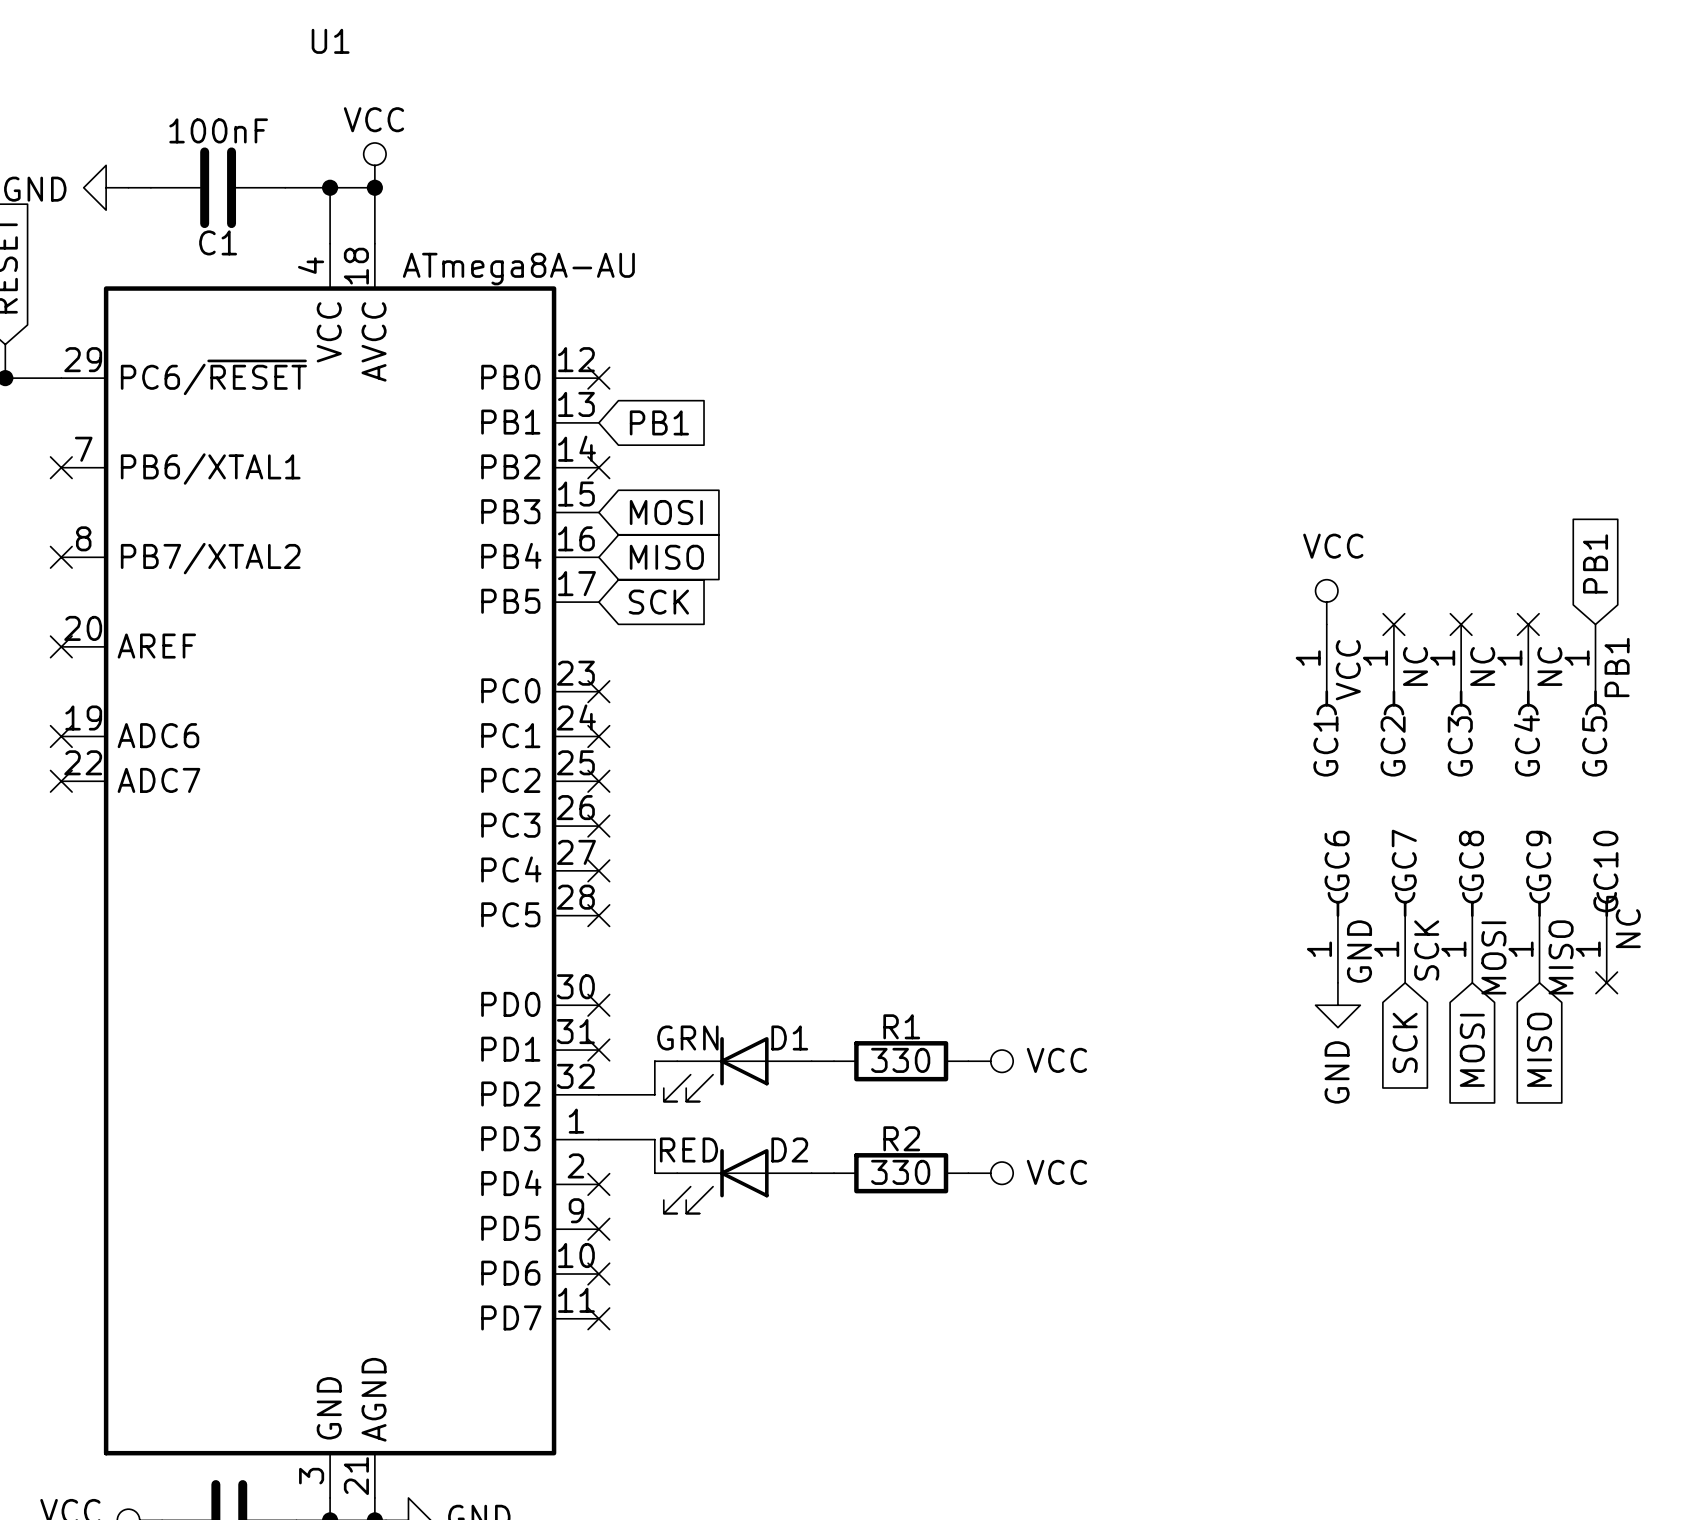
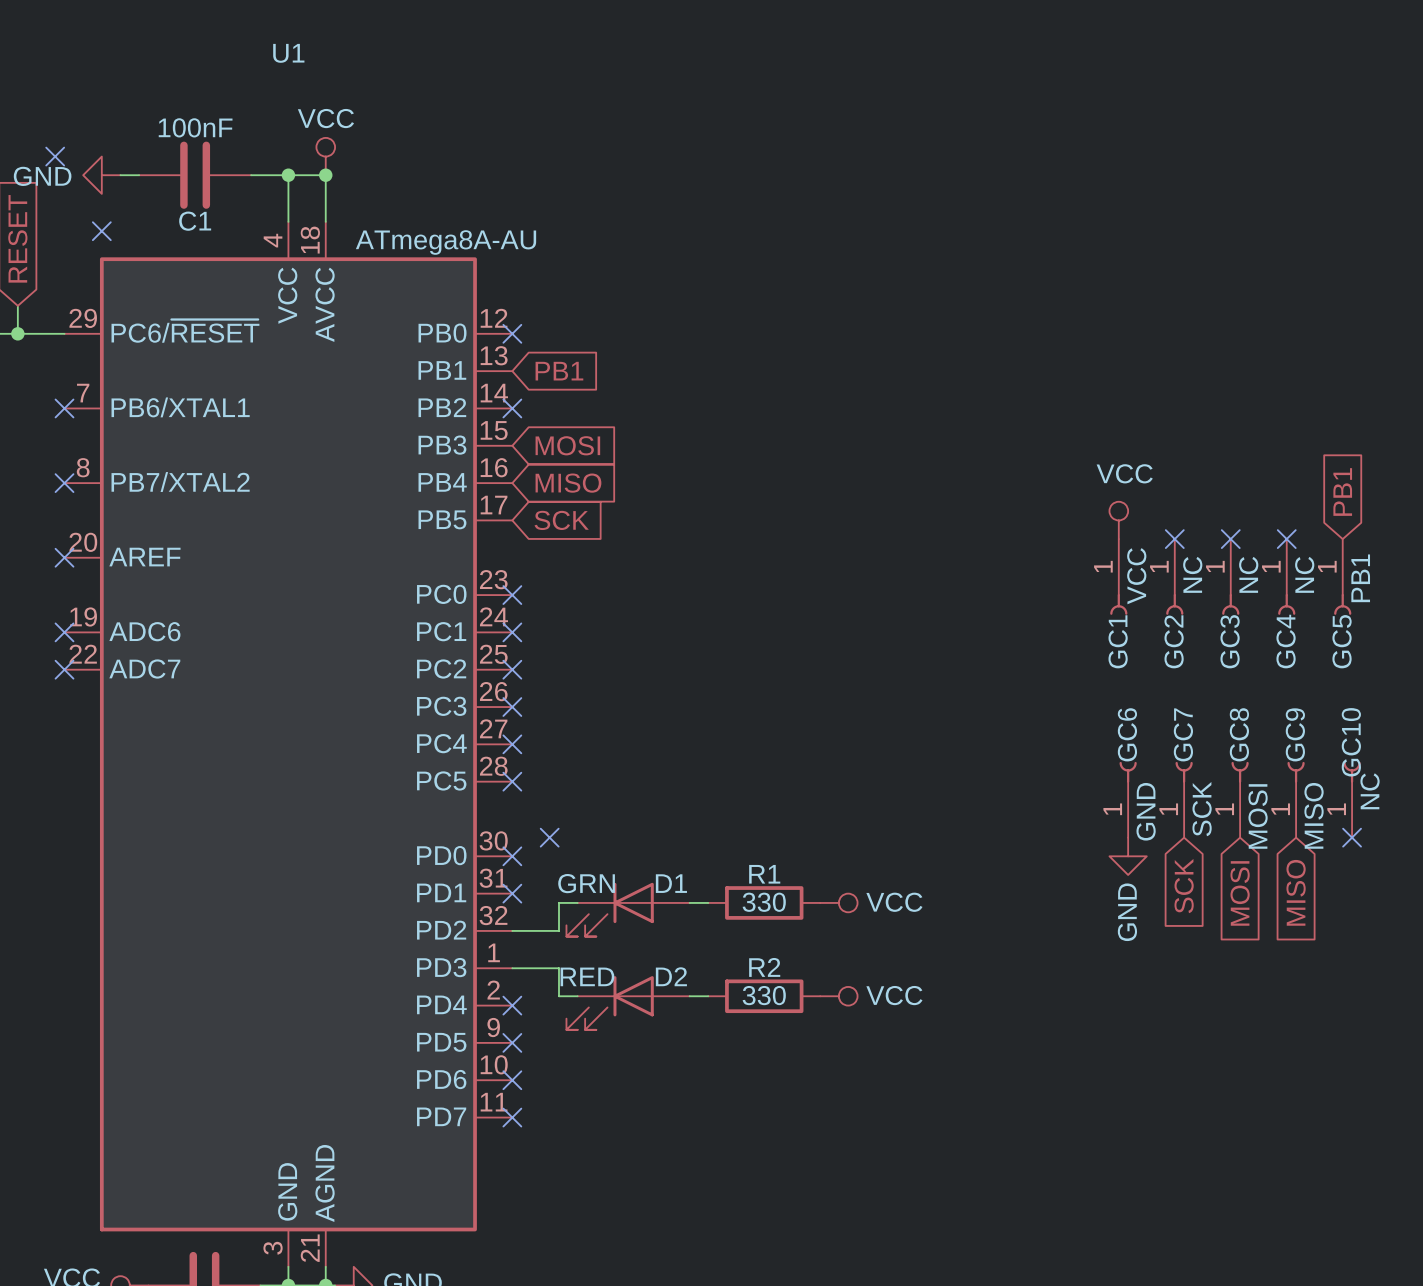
no-connect mark: none -> (55, 156)
no-connect mark: none -> (101, 231)
no-connect mark: none -> (549, 837)

